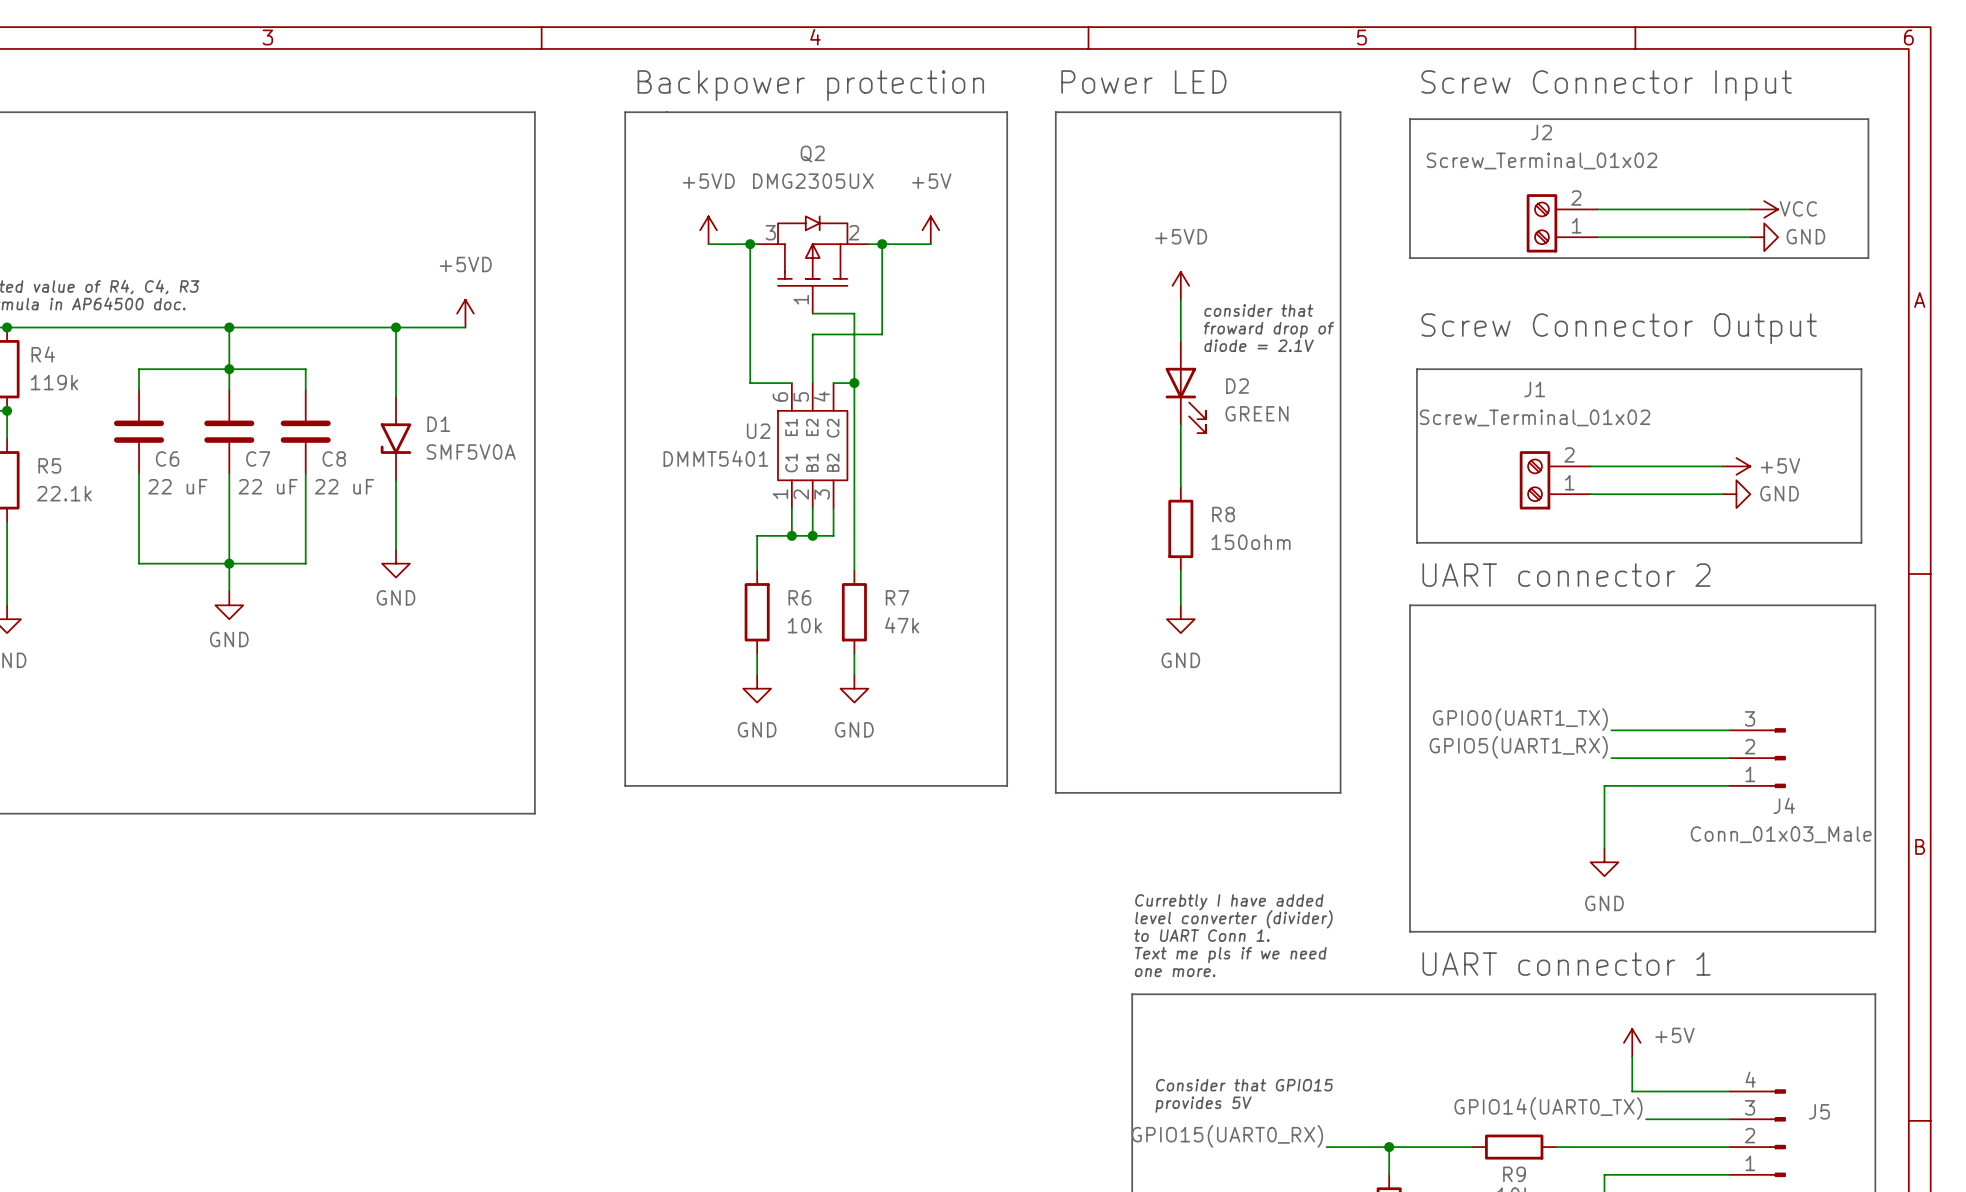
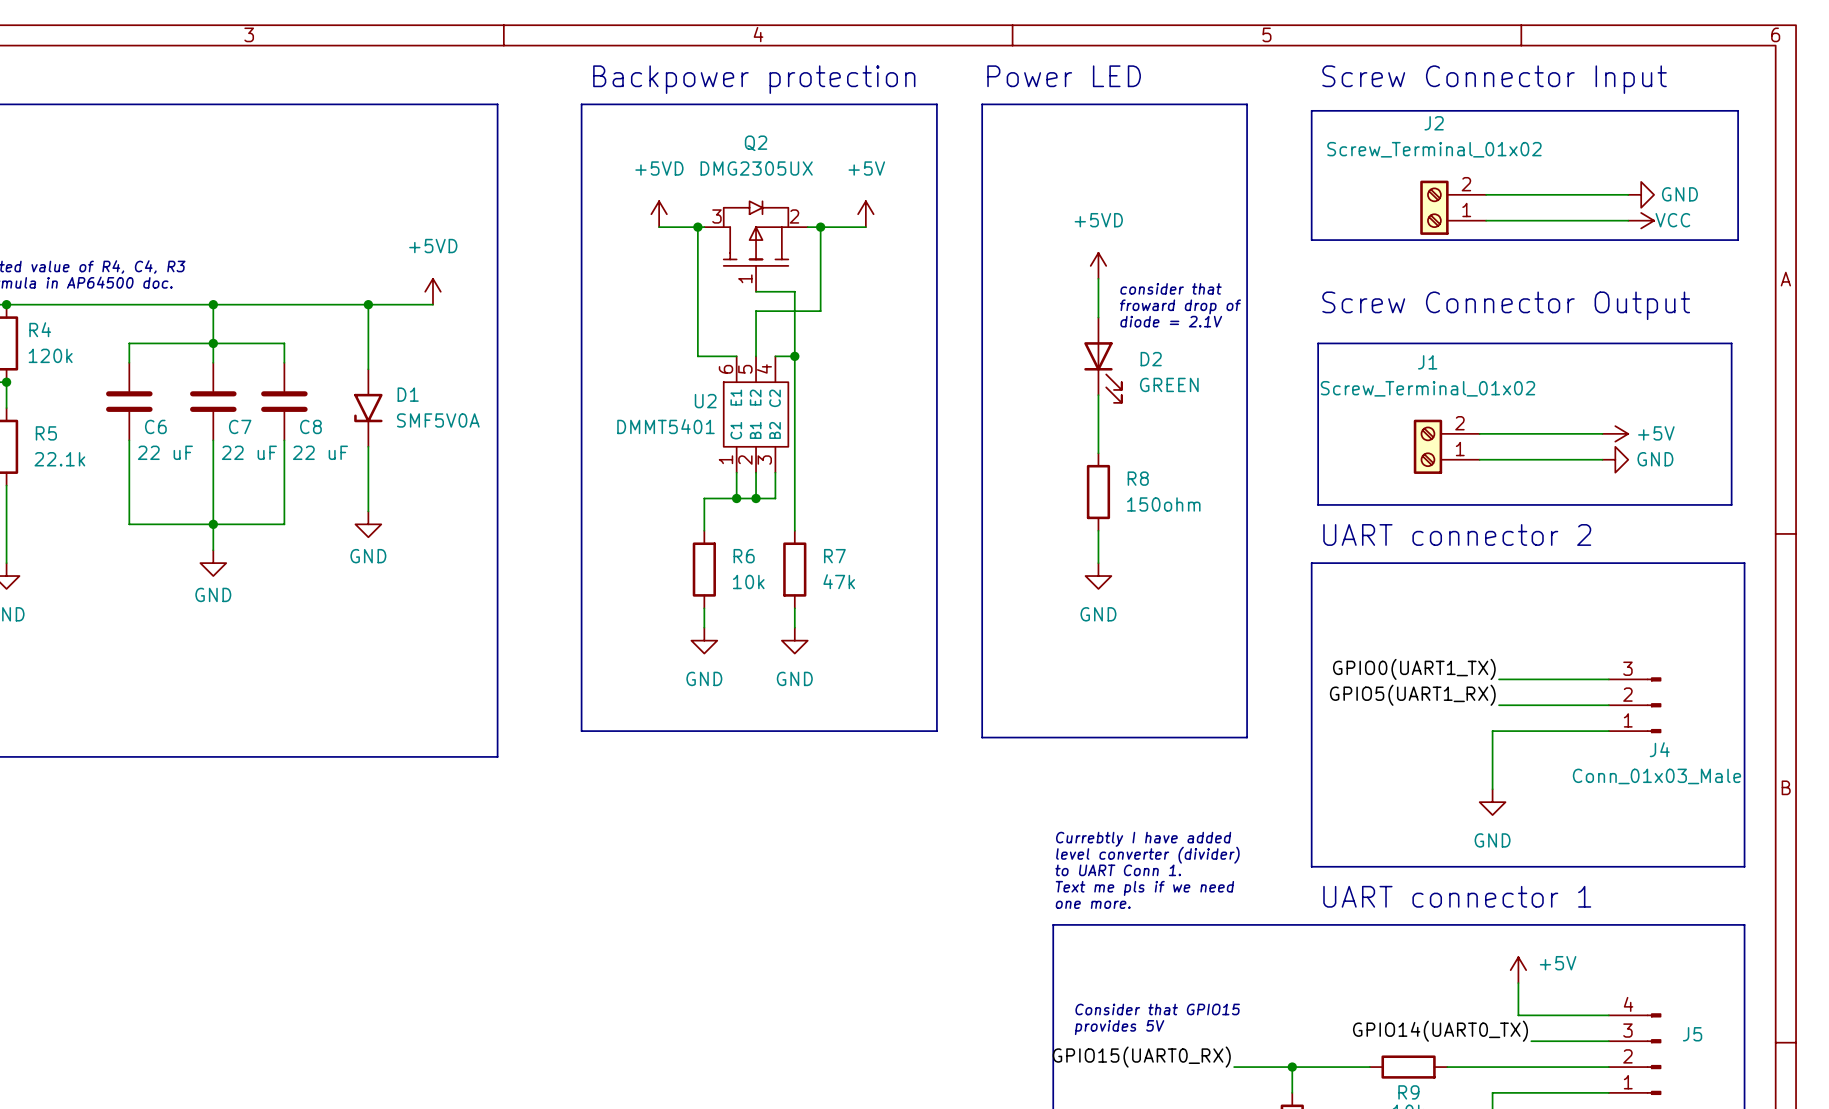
power symbol: VCC (1764, 209) -> GND (1641, 194)
power symbol: GND (1764, 237) -> VCC (1641, 220)
R4 value: 119k (54, 382) -> 120k (50, 355)

